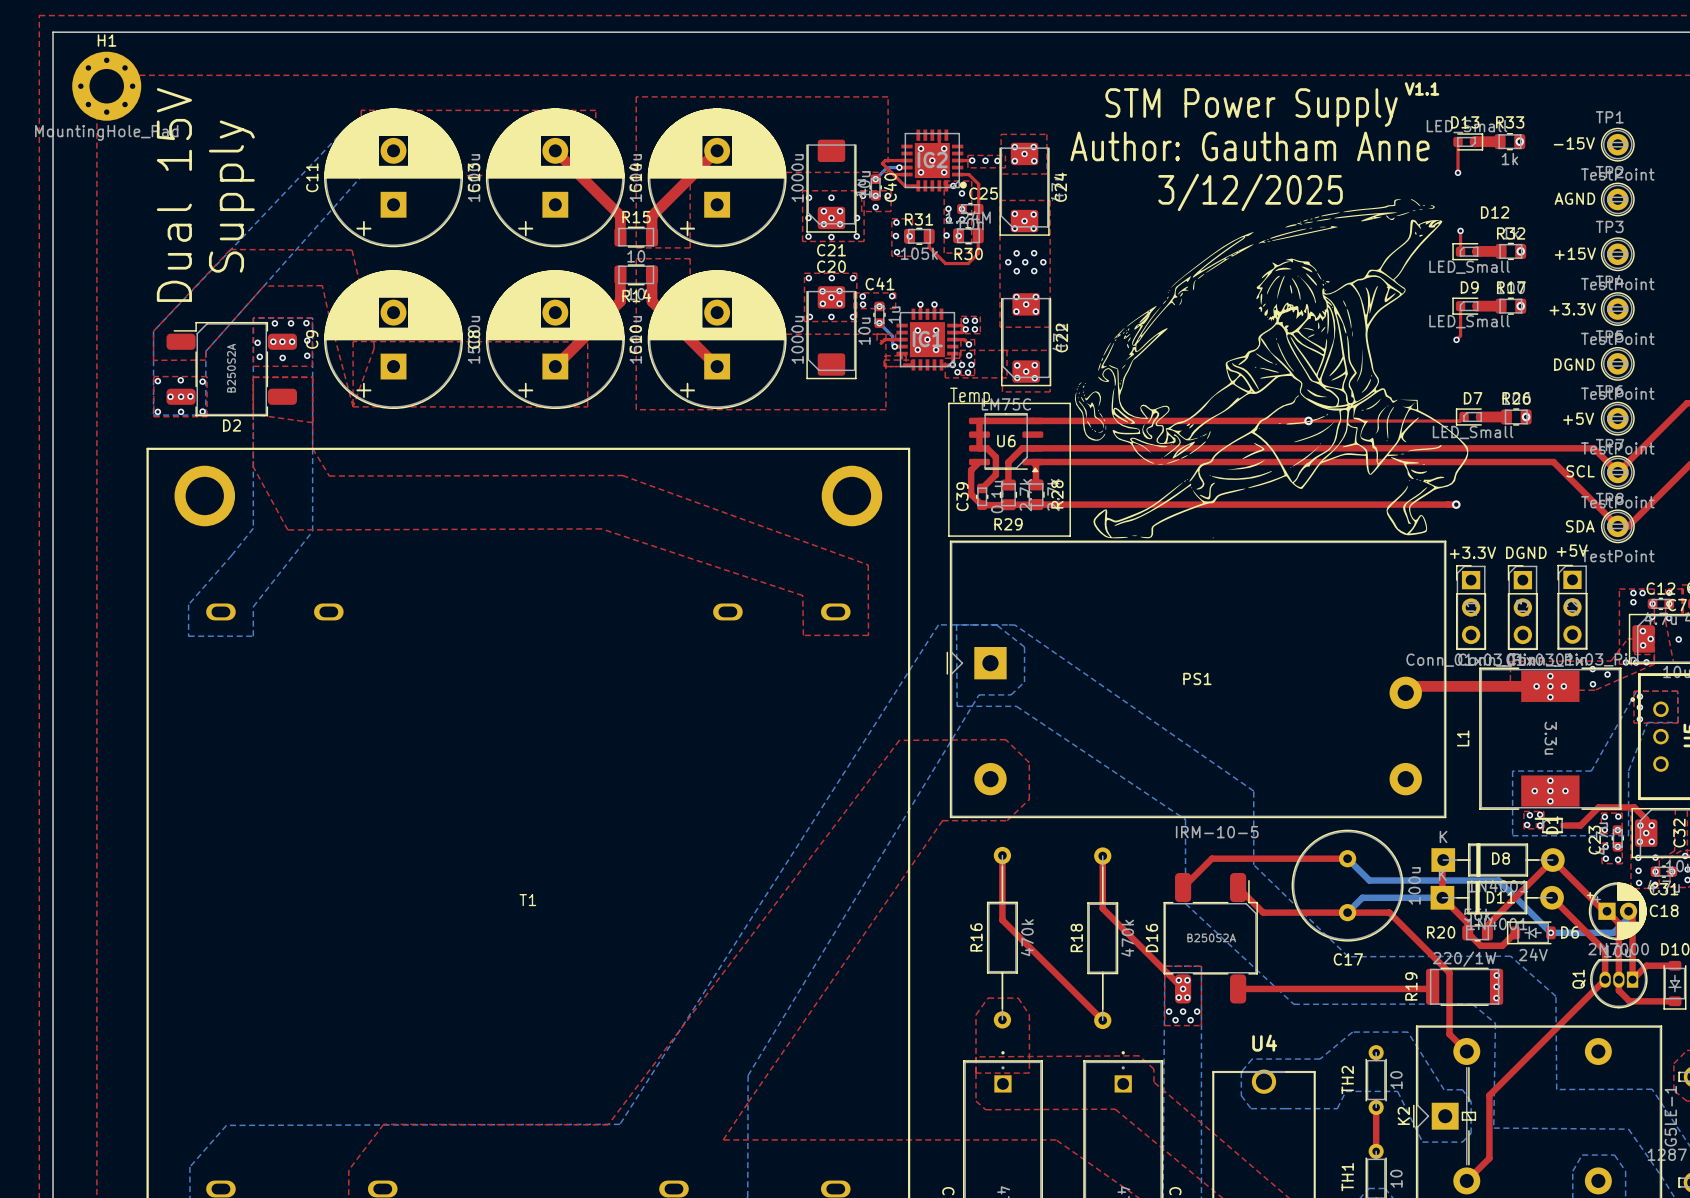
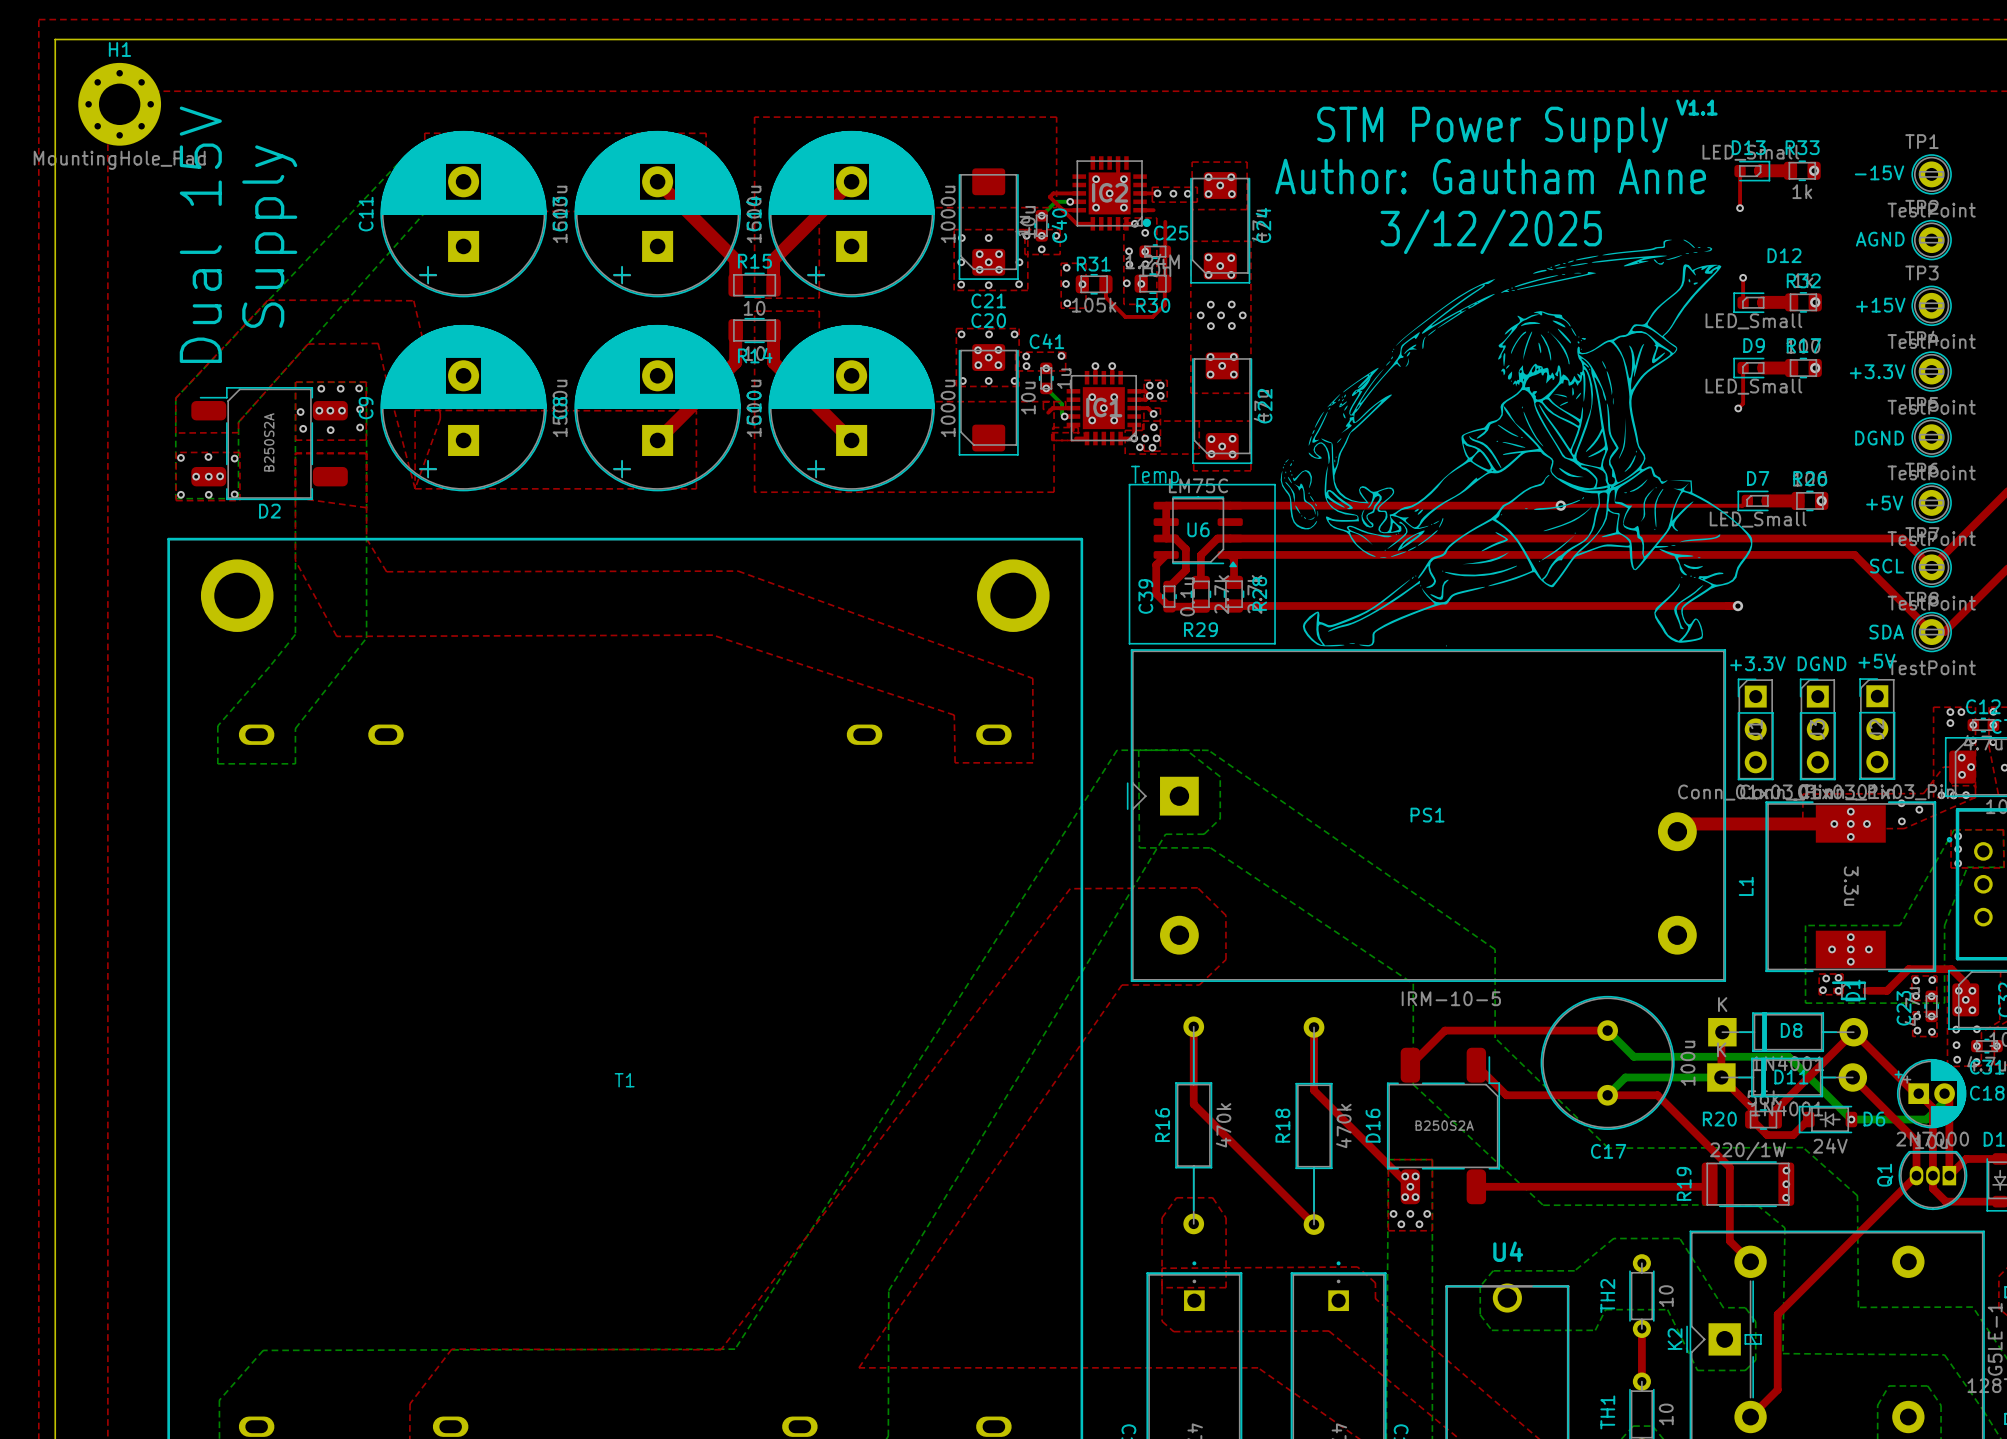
top track: (968, 174) (978, 184) -> none

